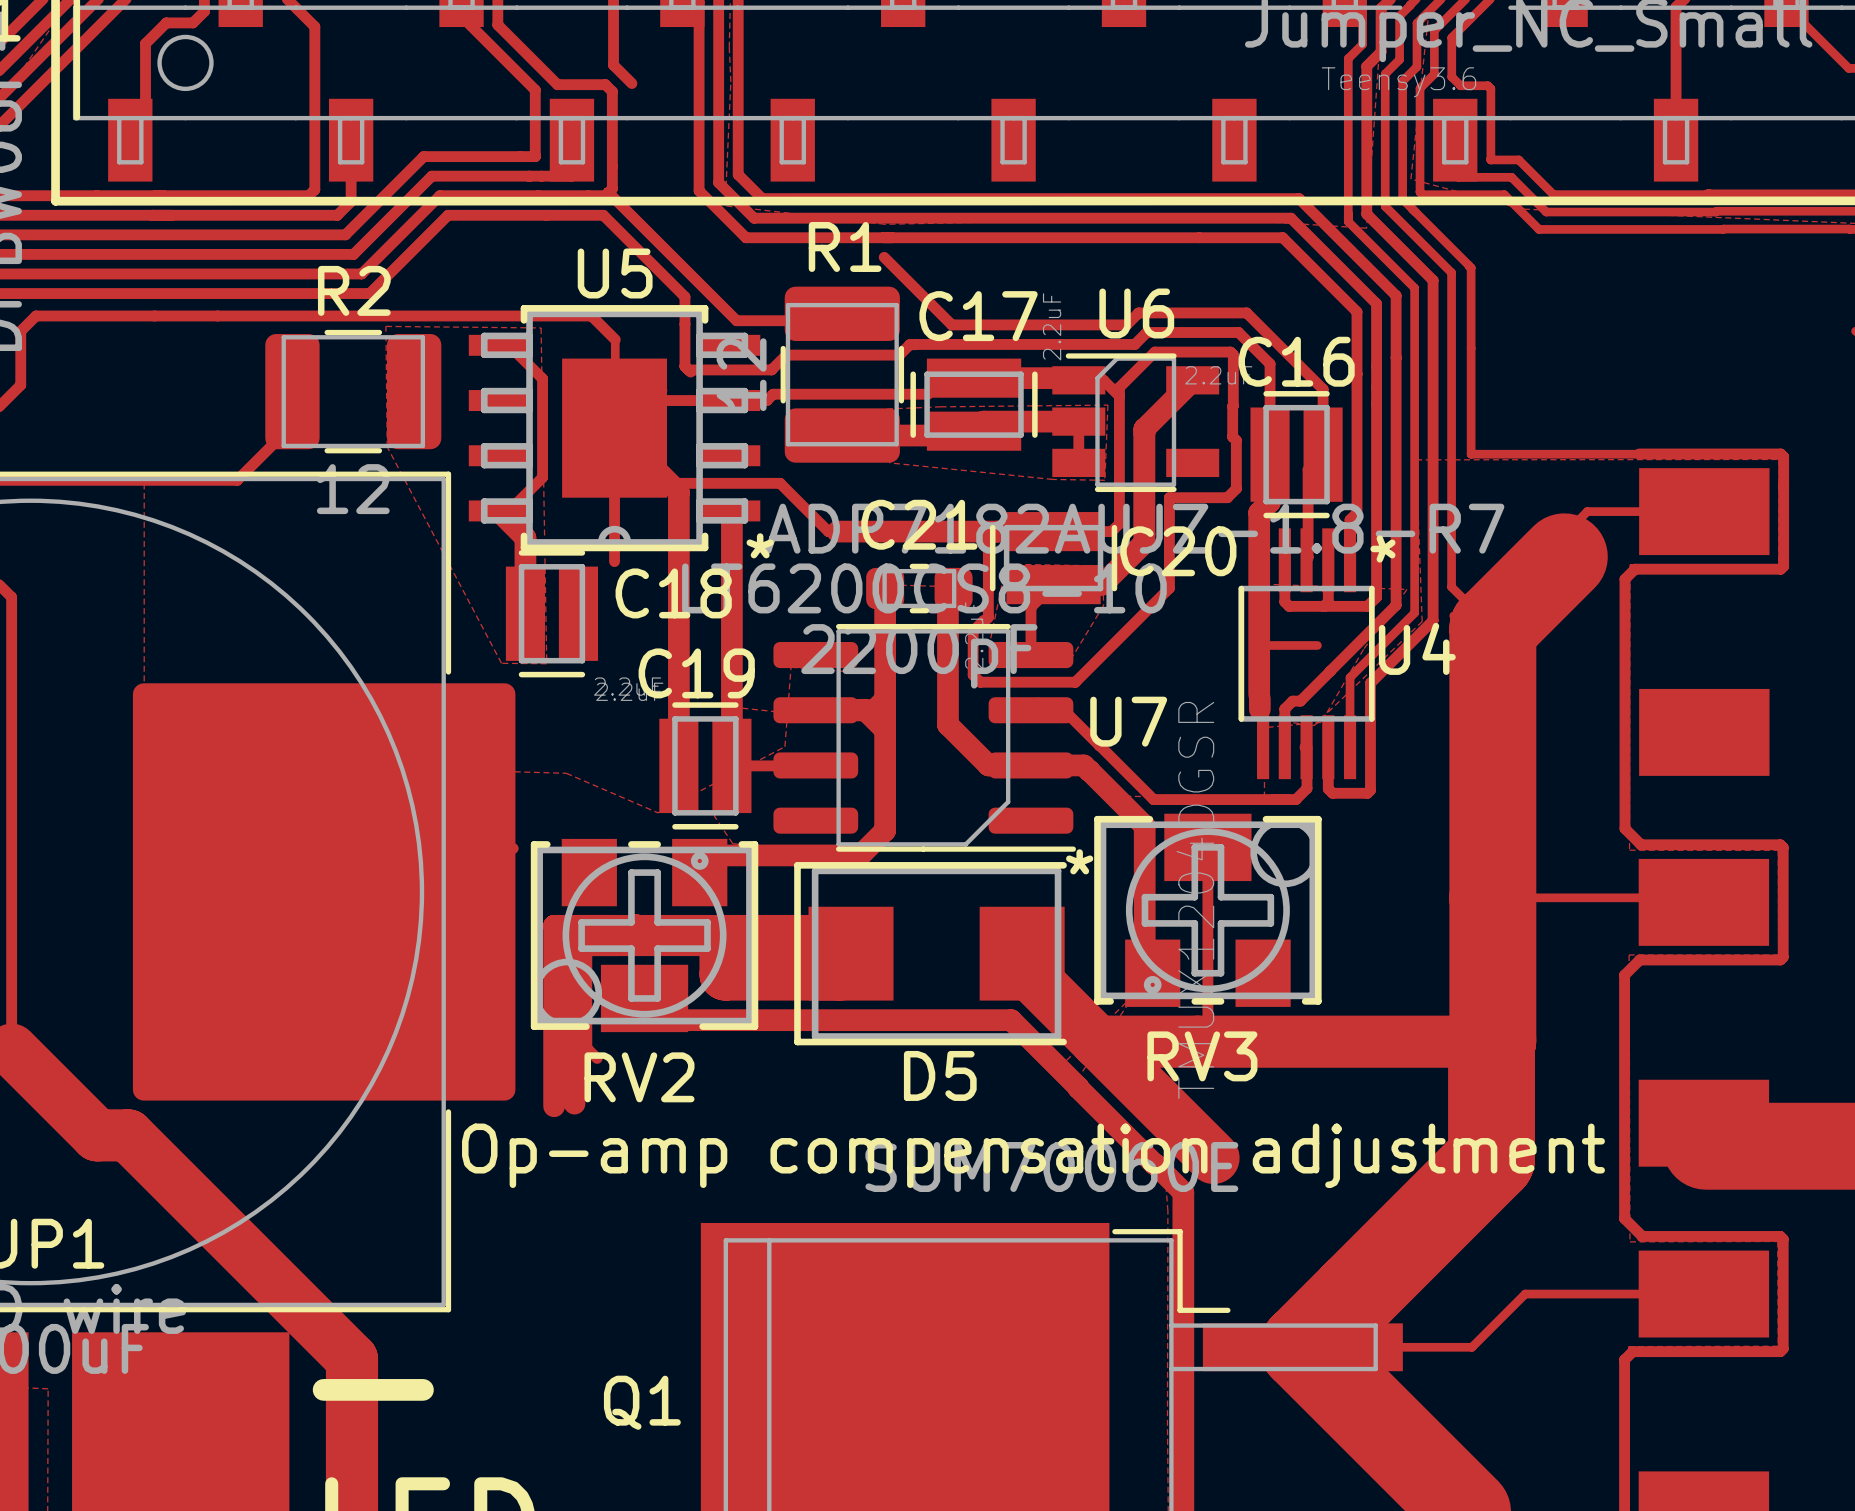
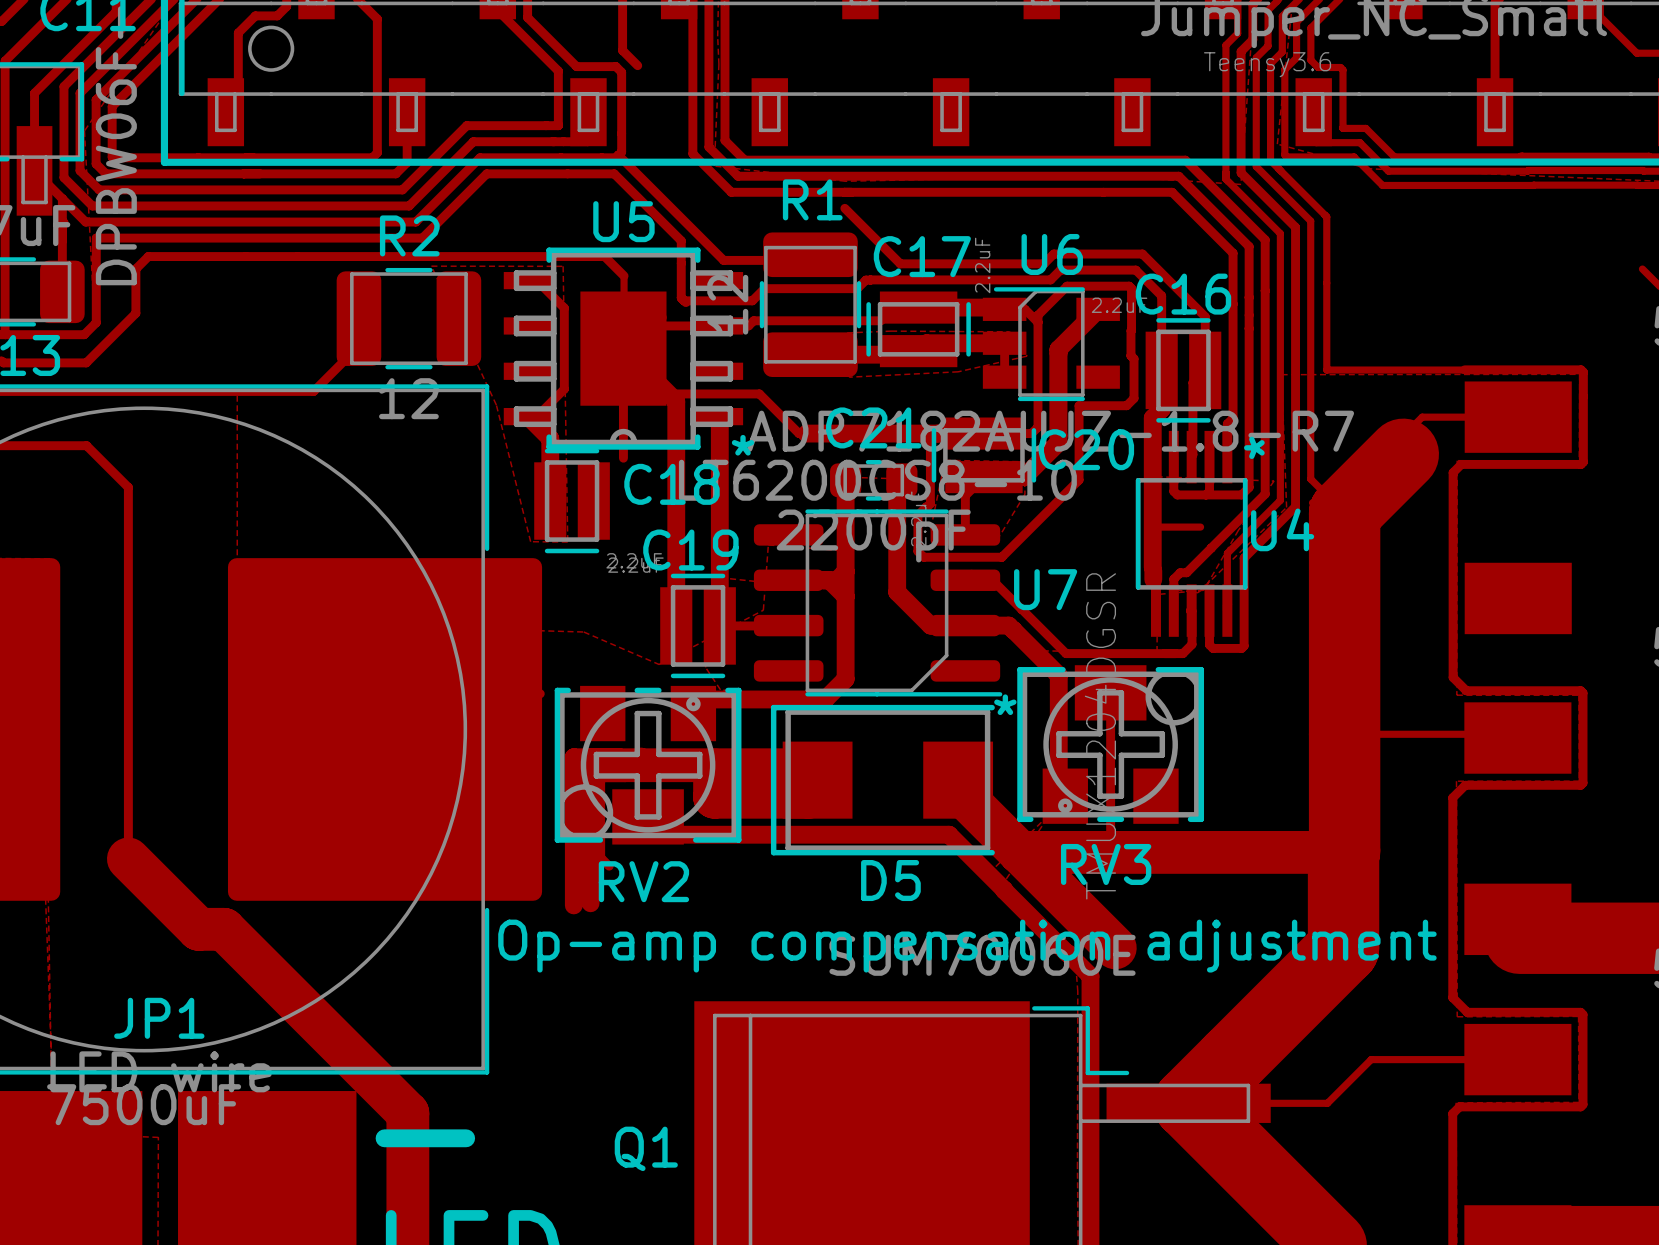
zone outline: (541, 327) (385, 326) (387, 446) (501, 663) -> (563, 266) (431, 266) (496, 405) (530, 541)
zone outline: (940, 406) (1107, 405) (1104, 480) (1052, 479) (889, 462) -> (891, 331) (1009, 331) (1027, 356) (958, 371) (849, 377)

